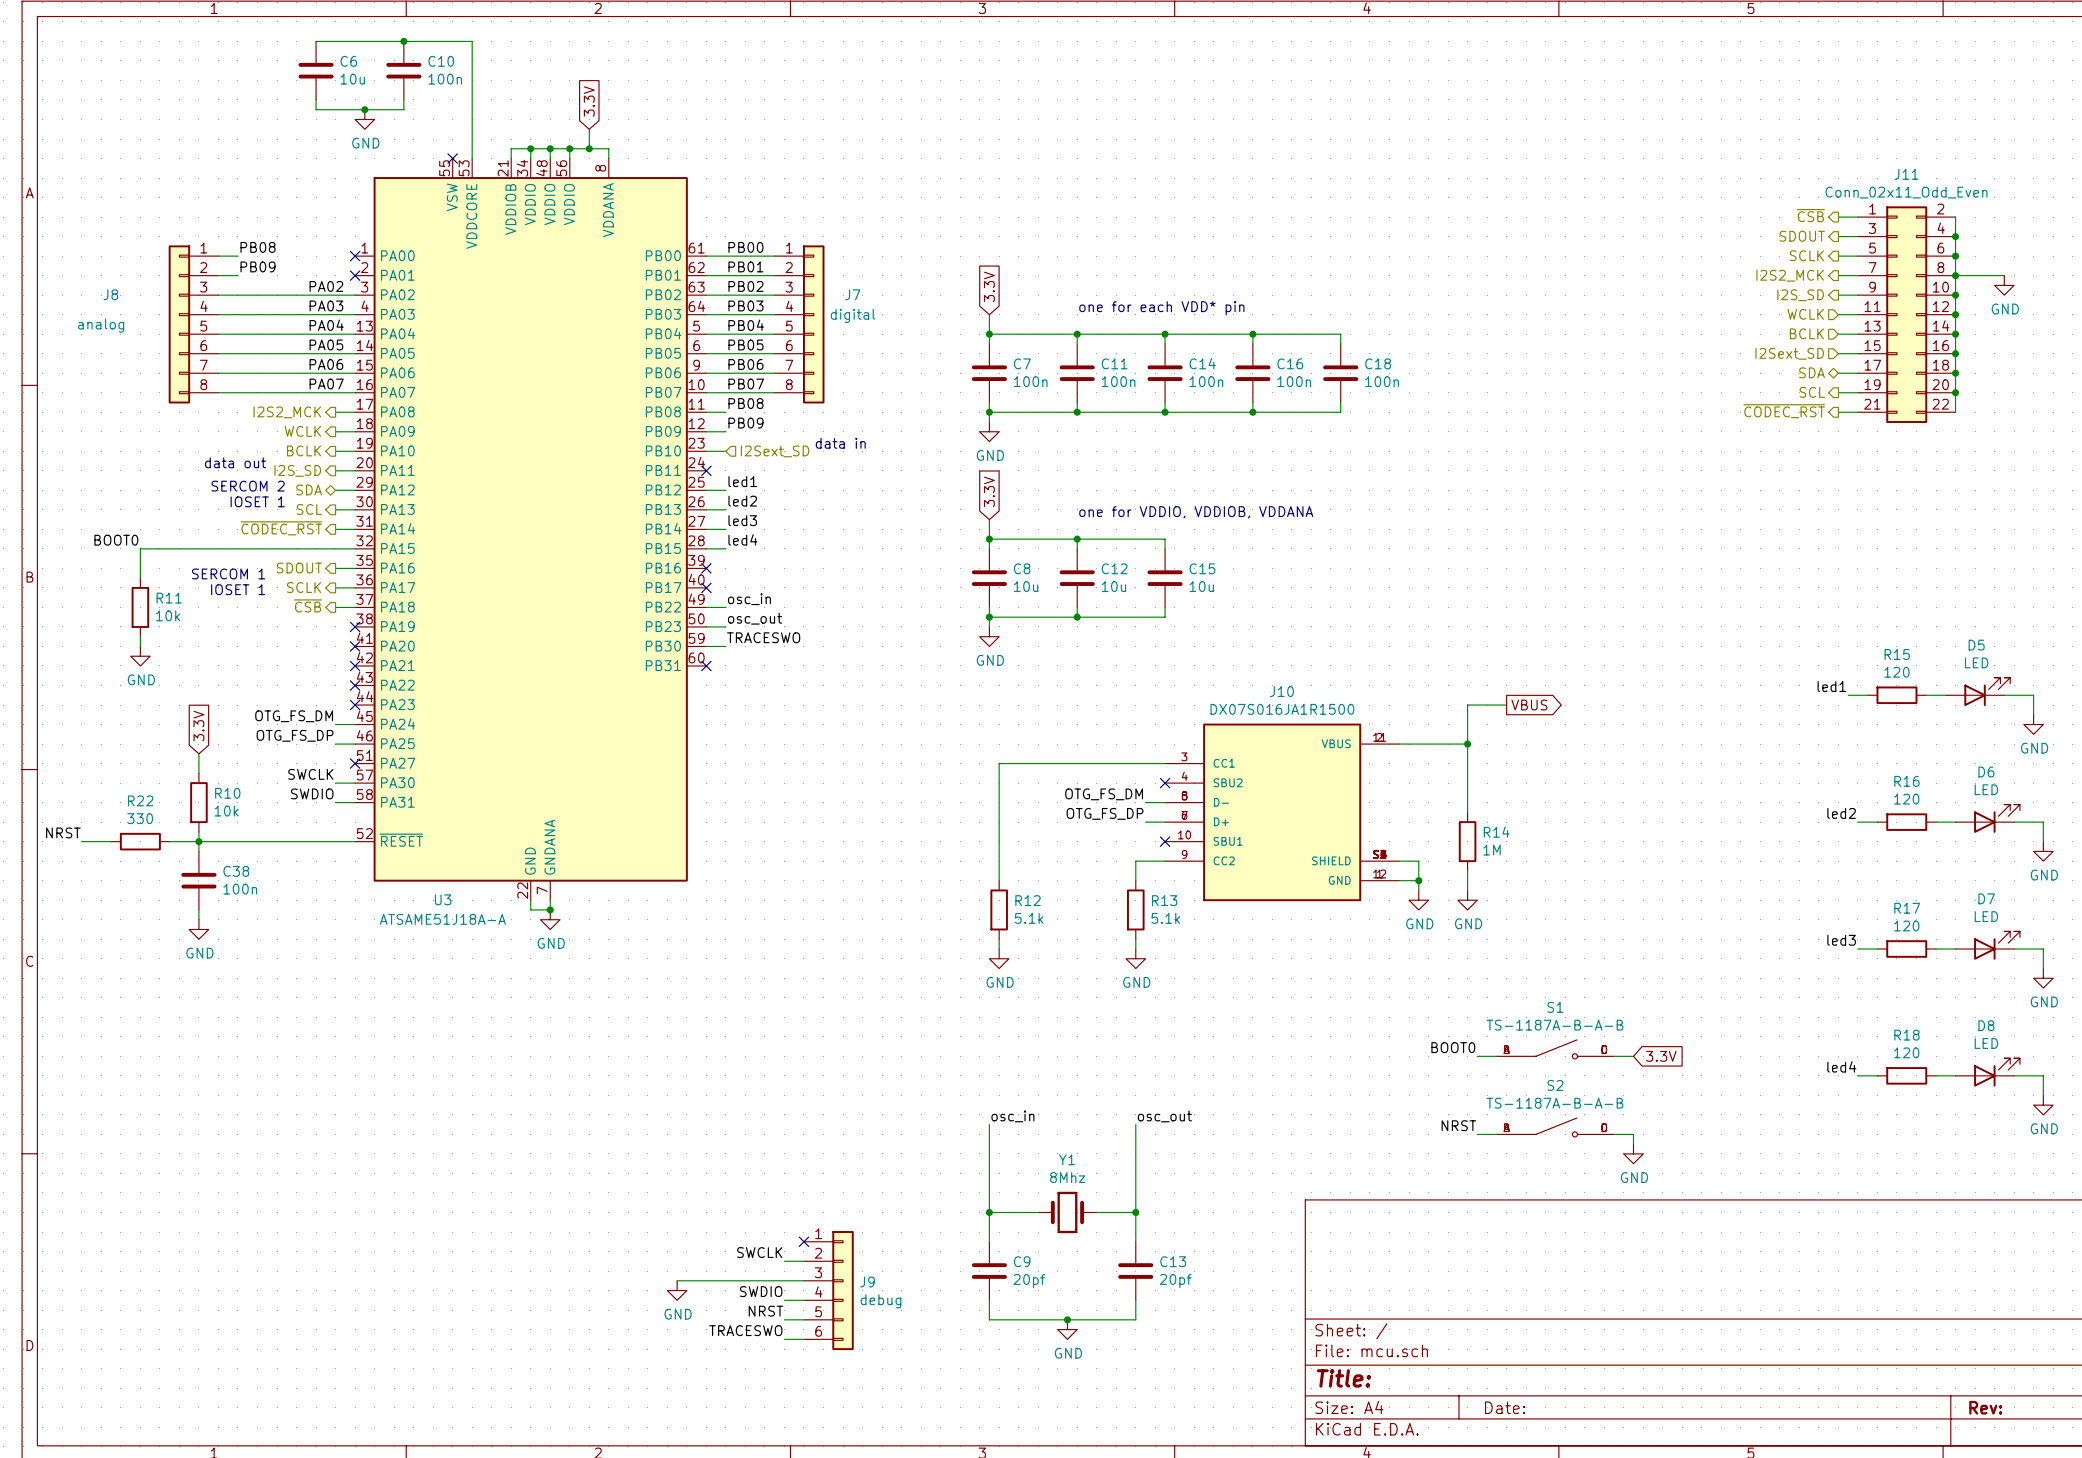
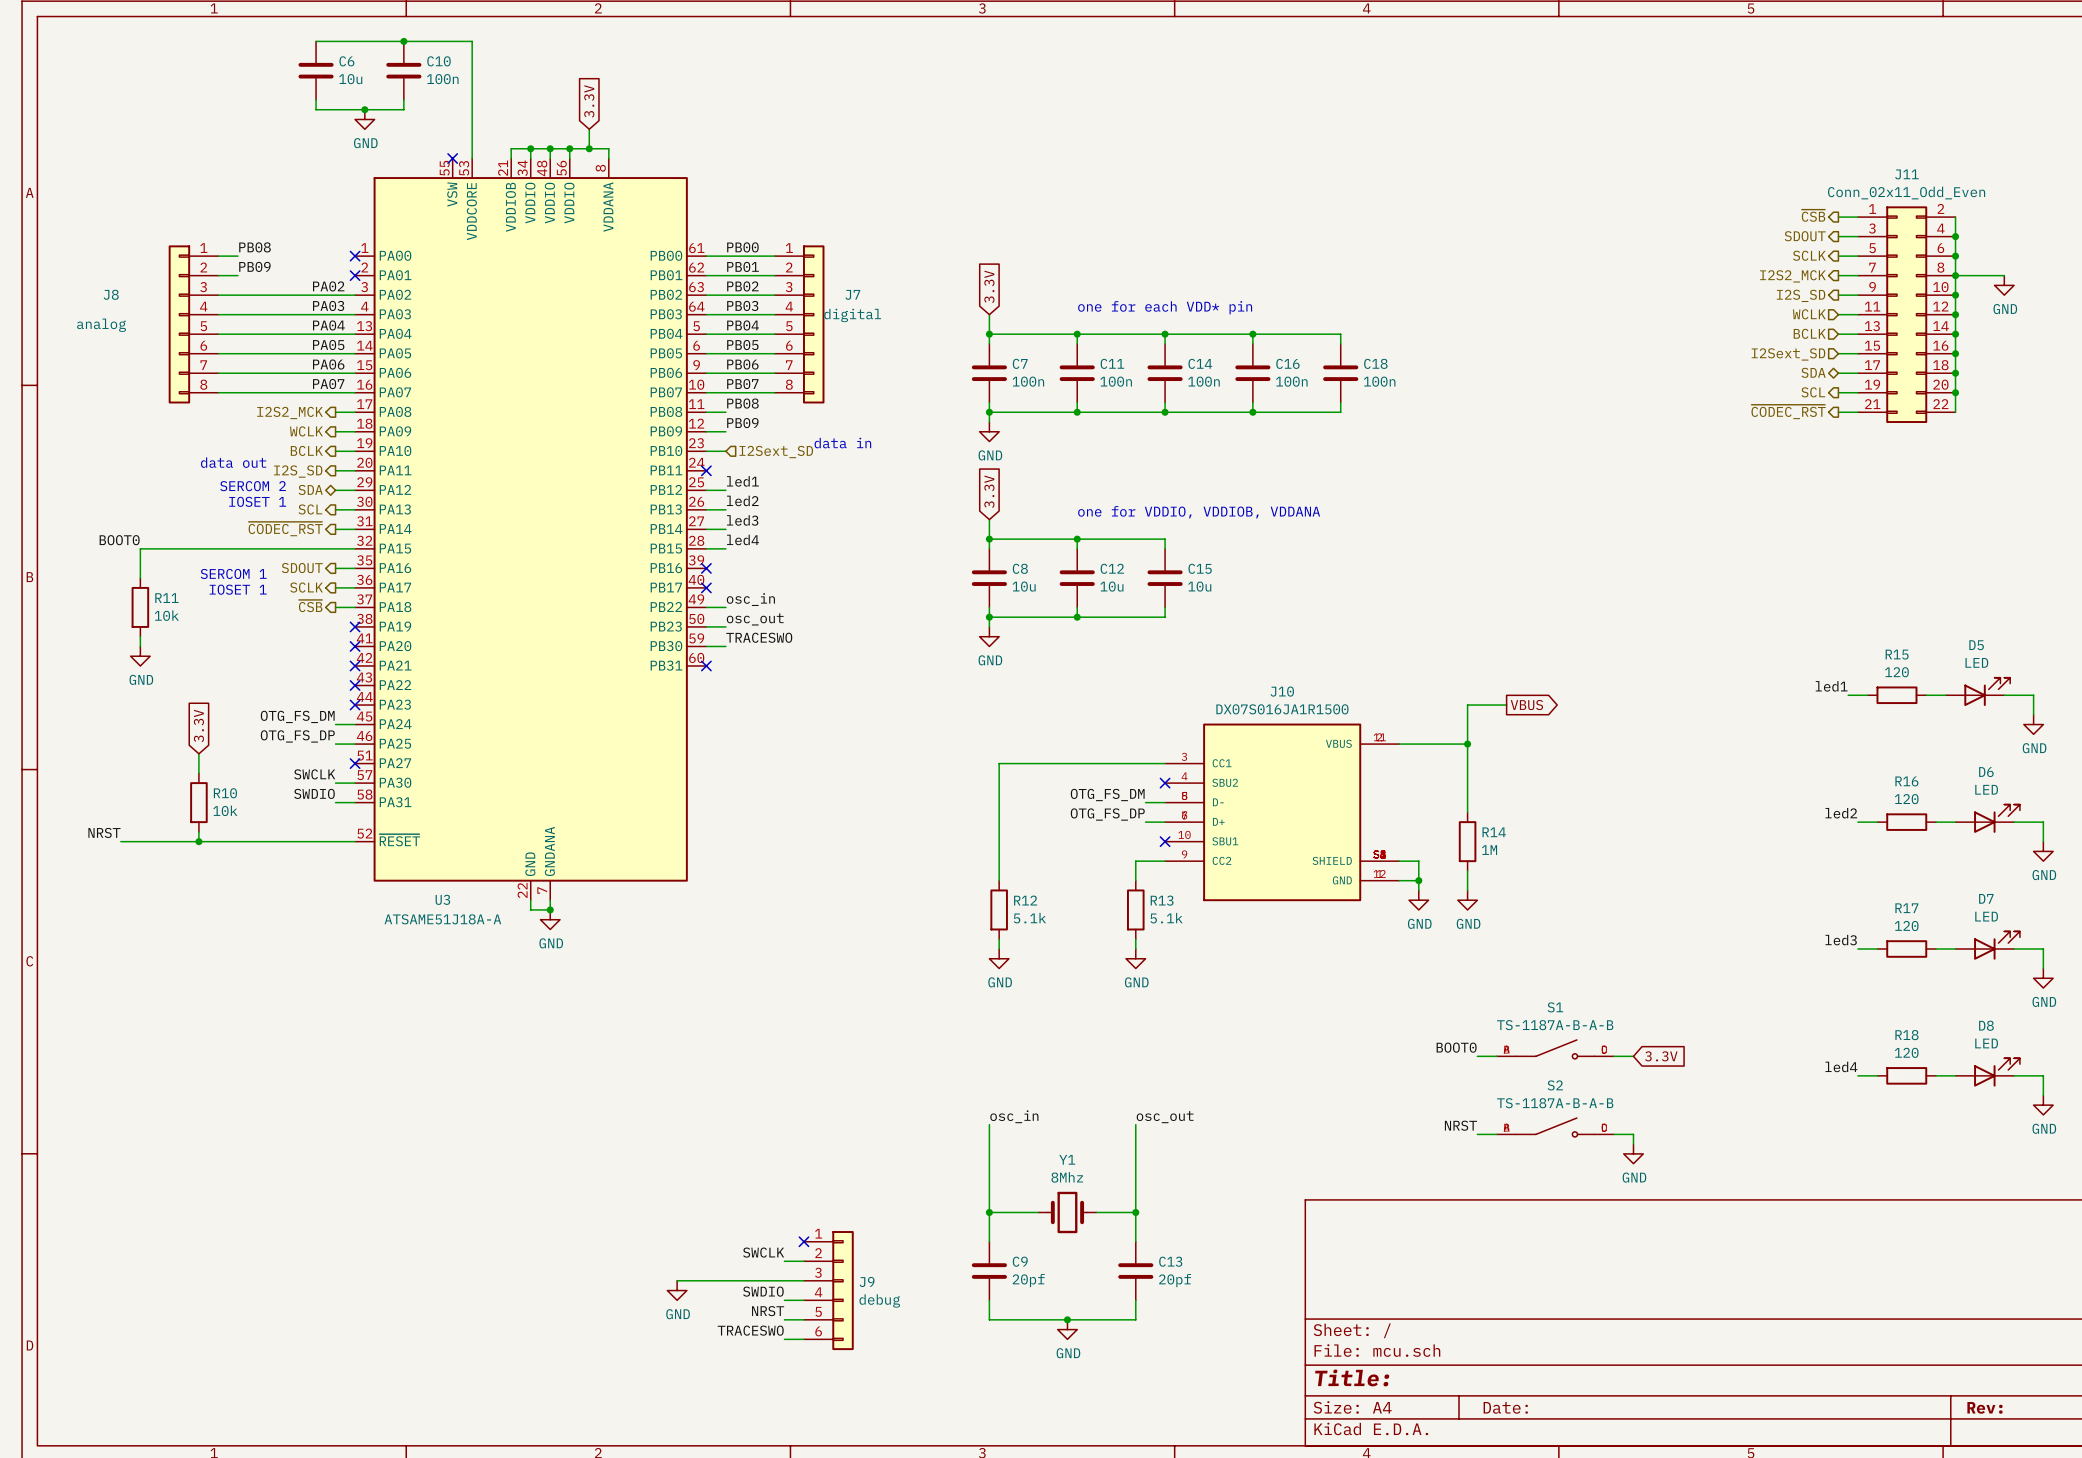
label position: NRST (63, 832) -> NRST (104, 832)
wire: (81, 841) (111, 841) -> none
wire: none -> (120, 841) (169, 841)
R22: 330 (140, 841) -> none
wire: (198, 841) (198, 851) -> none
C38: 100n (198, 880) -> none
wire: (198, 909) (198, 919) -> none
power symbol: GND (198, 929) -> none

